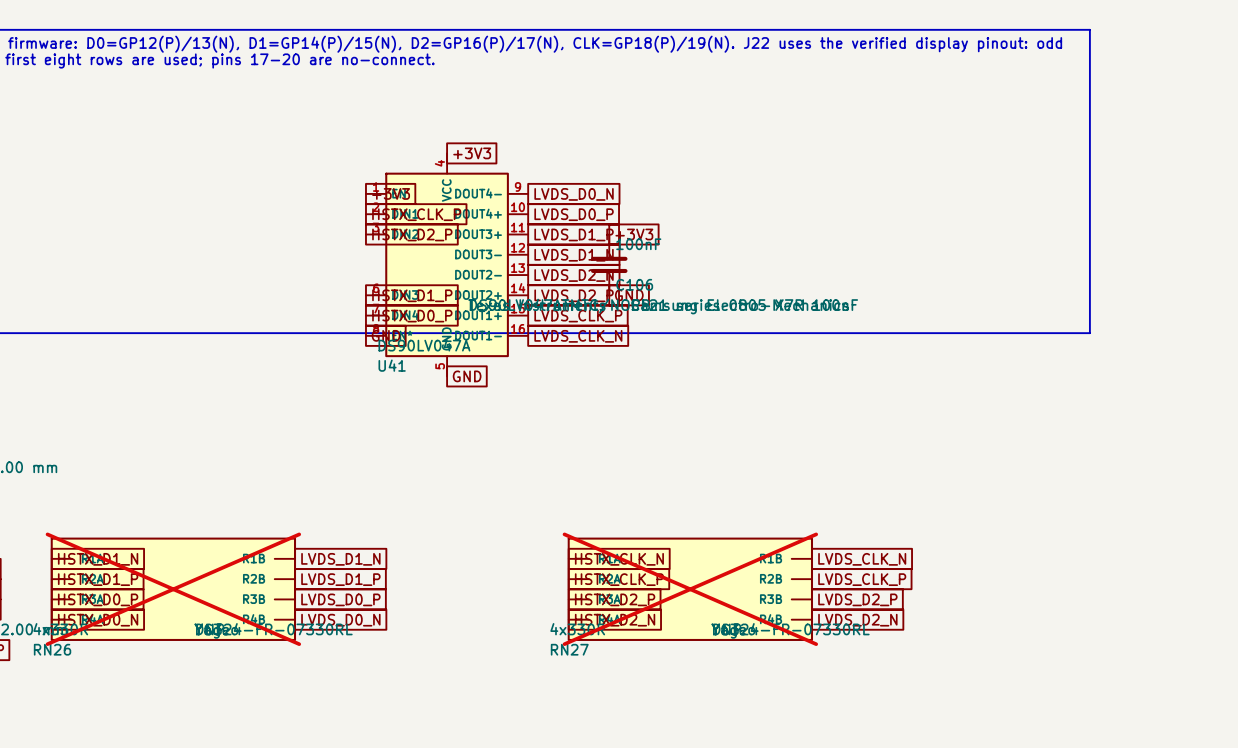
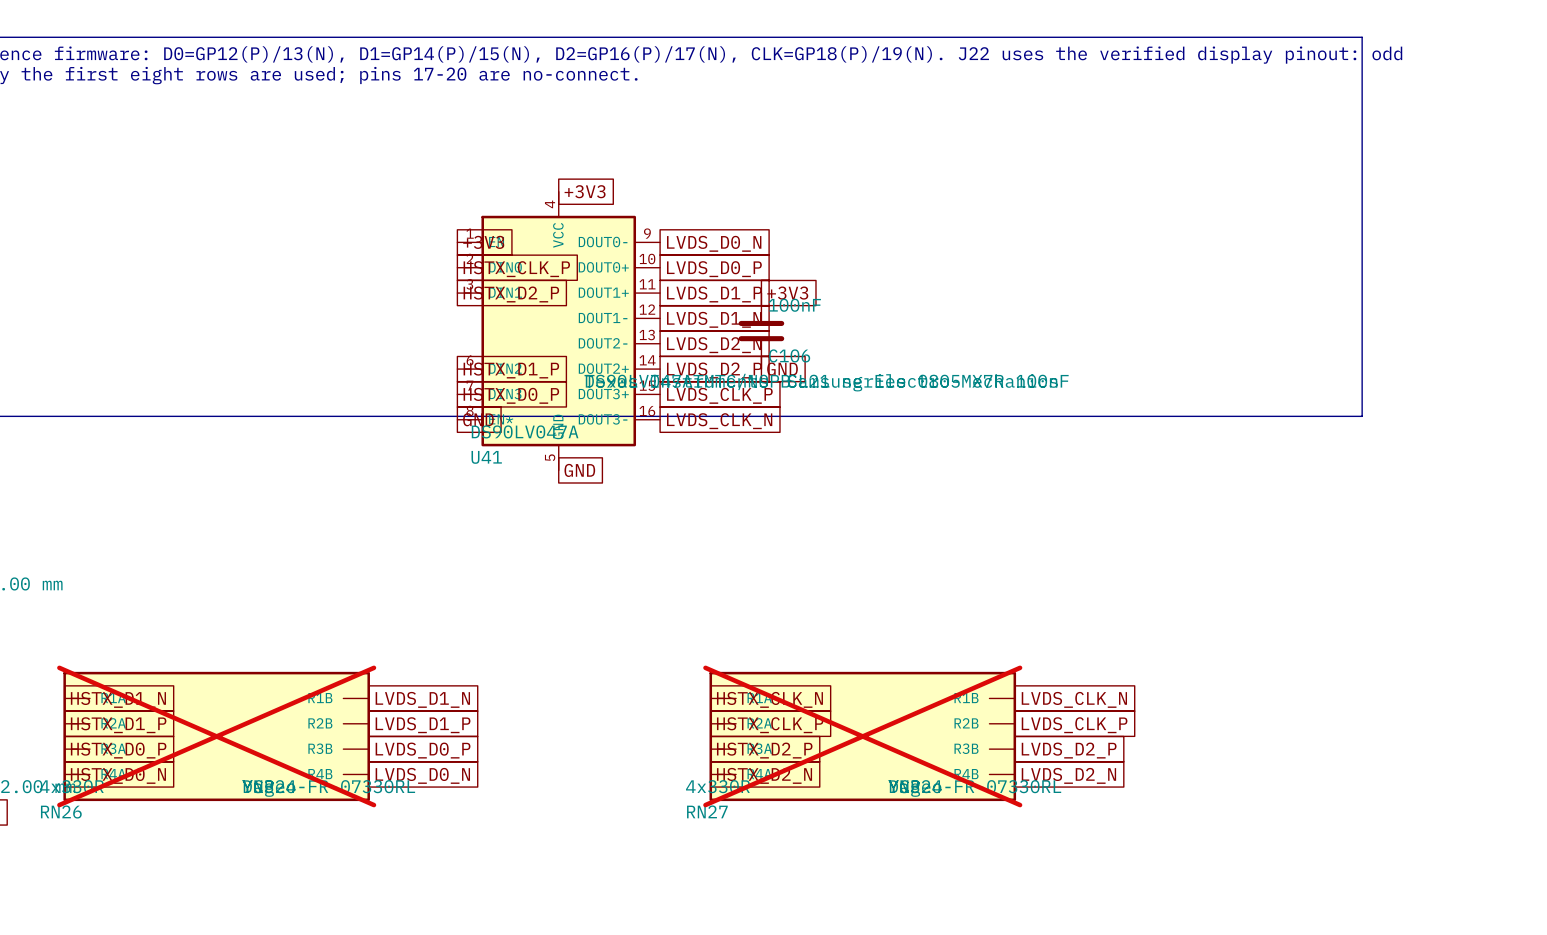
U41 symbol: [365, 153, 529, 377] -> [457, 191, 661, 471]

